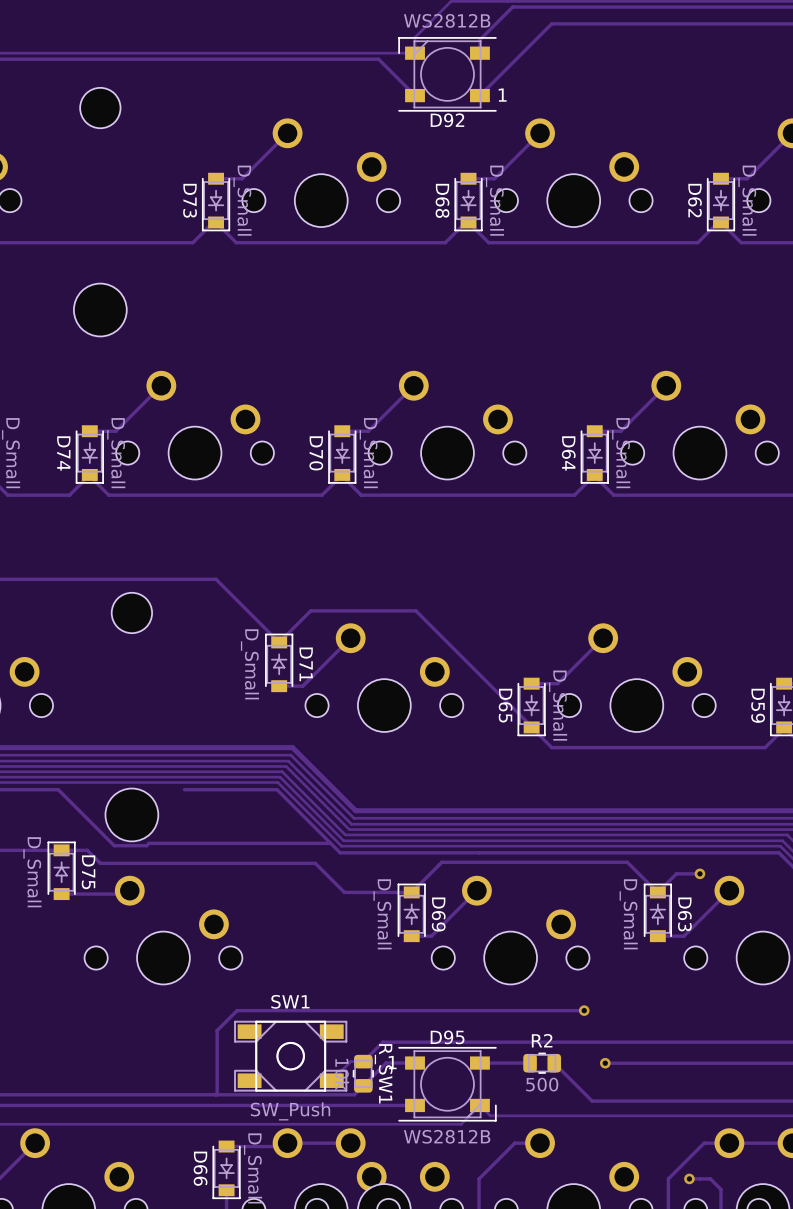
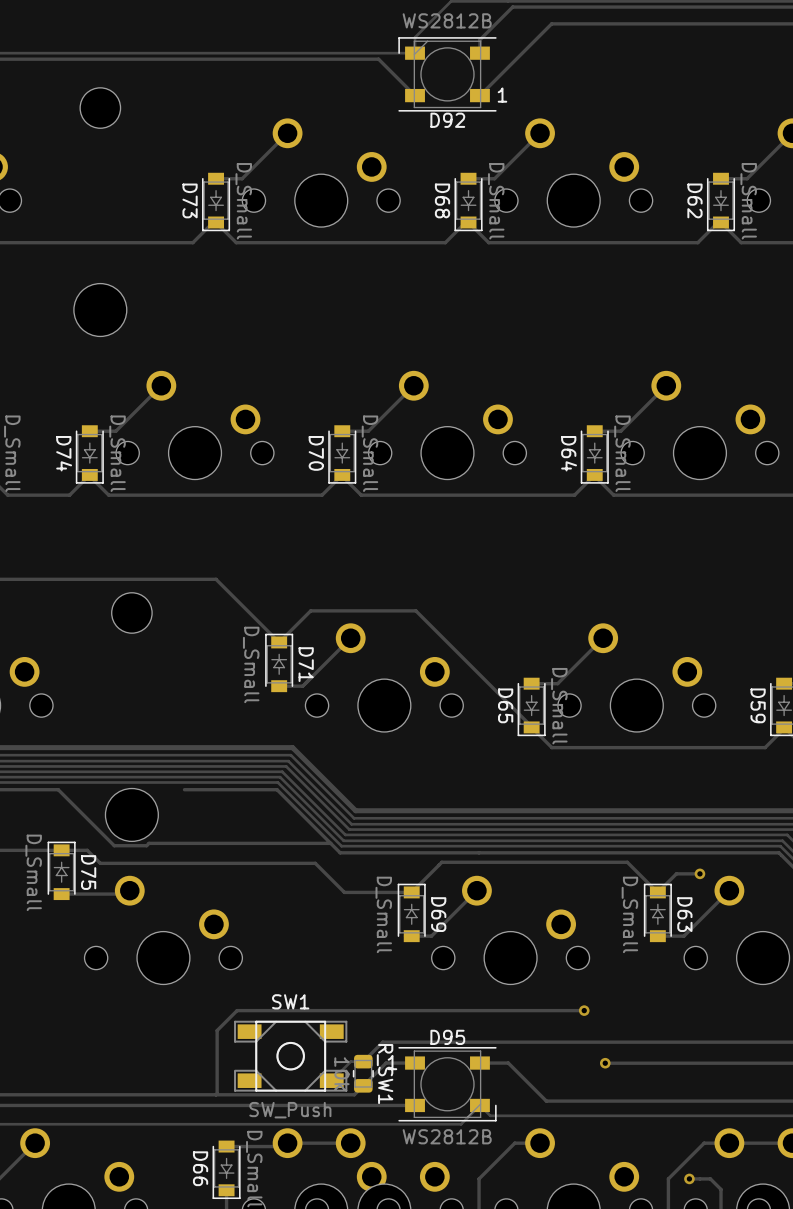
track: (529, 1063) (508, 1063) -> none
R2: 500 (542, 1063) -> none
track: (554, 1063) (592, 1101) -> (508, 1063) (546, 1101) (592, 1101)

